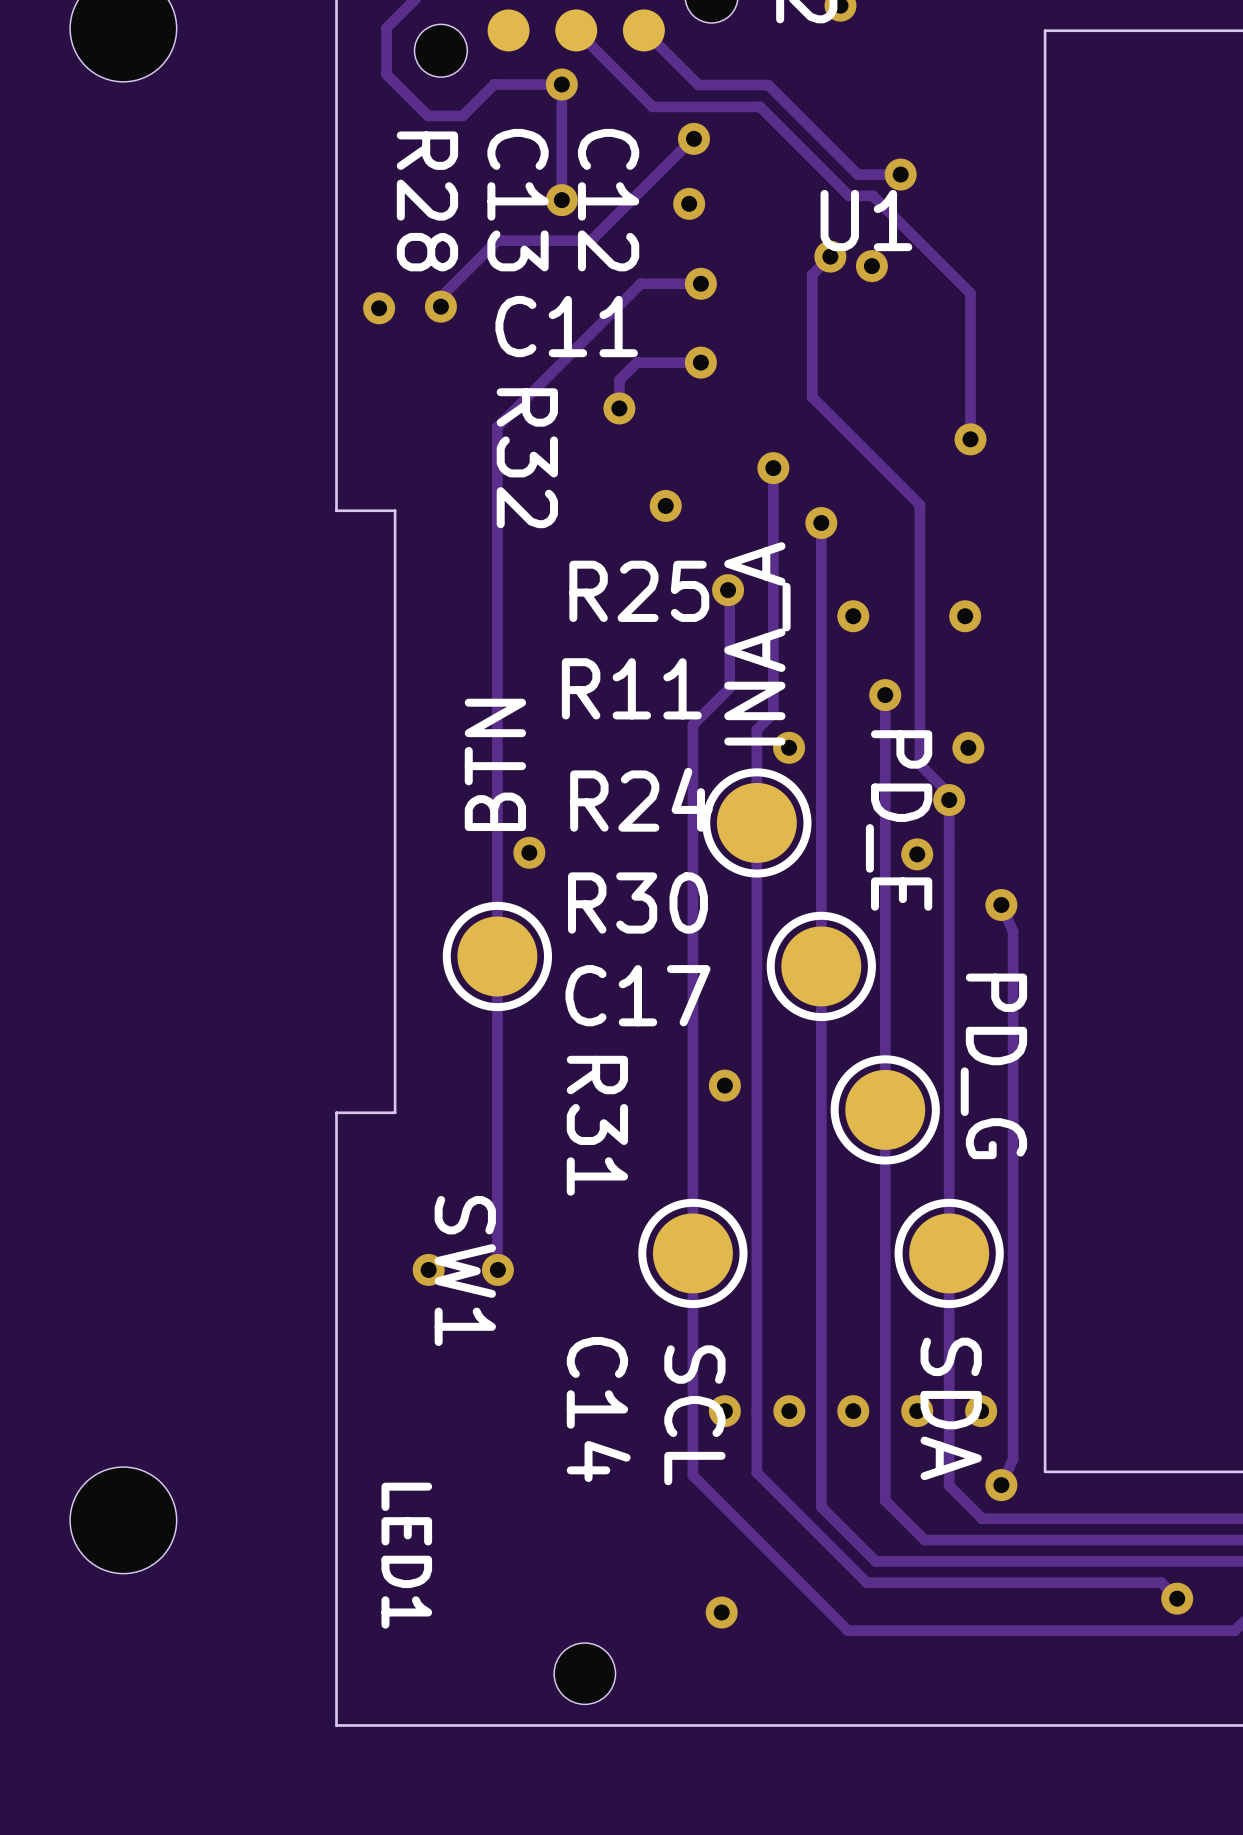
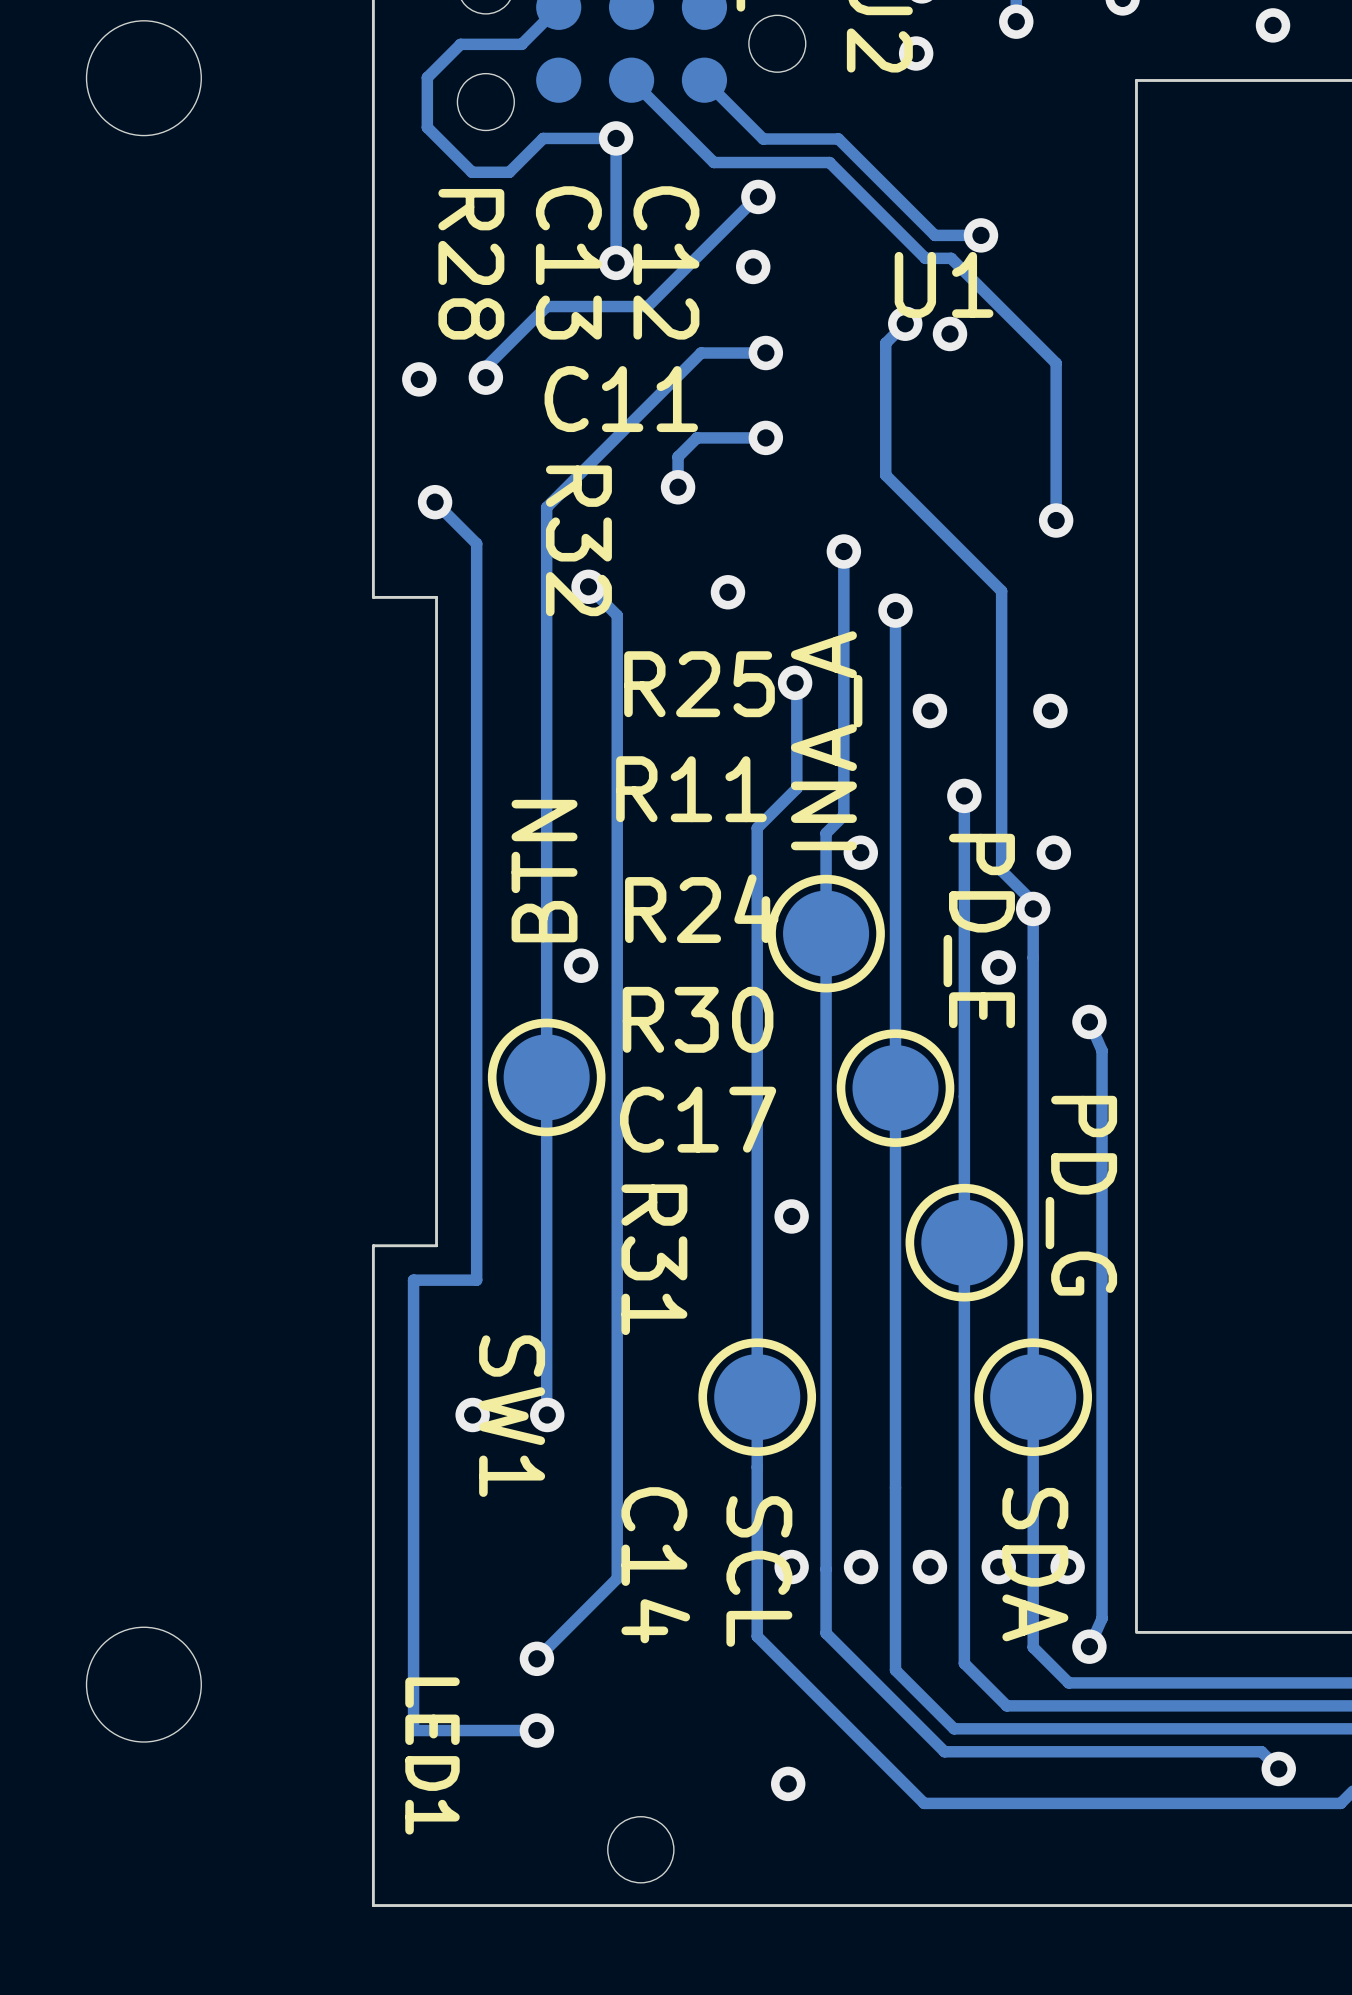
track: none -> (435, 502) (476, 543) (476, 1280) (413, 1280) (413, 1730) (536, 1730)
via: none -> (435, 502)
track: none -> (588, 586) (617, 615) (617, 1578) (536, 1658)
via: none -> (588, 586)
via: none -> (536, 1658)
LED1 position: (406, 1555) -> (432, 1756)
via: none -> (536, 1730)

